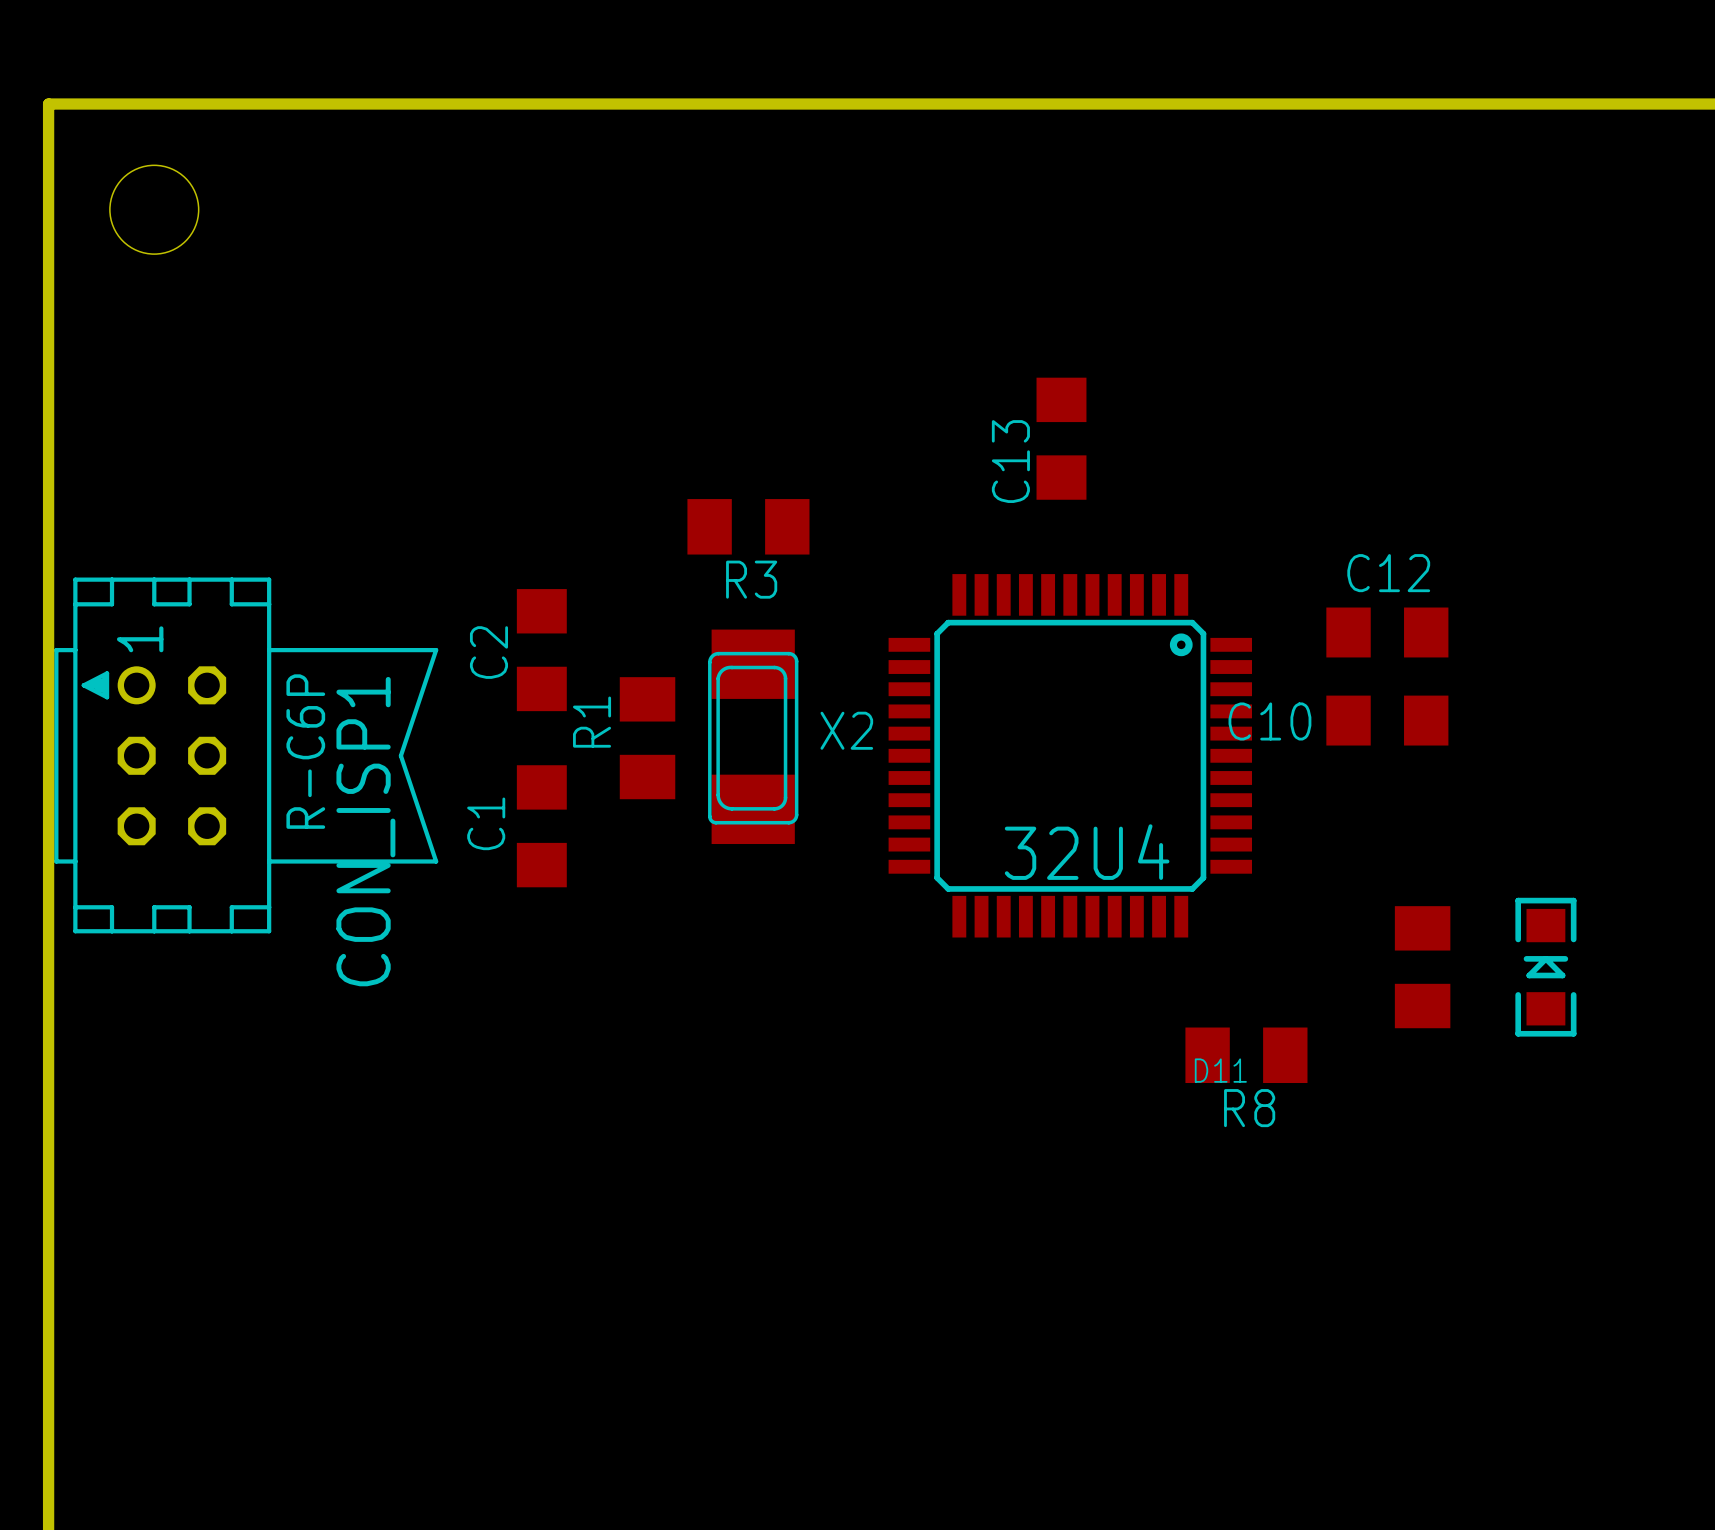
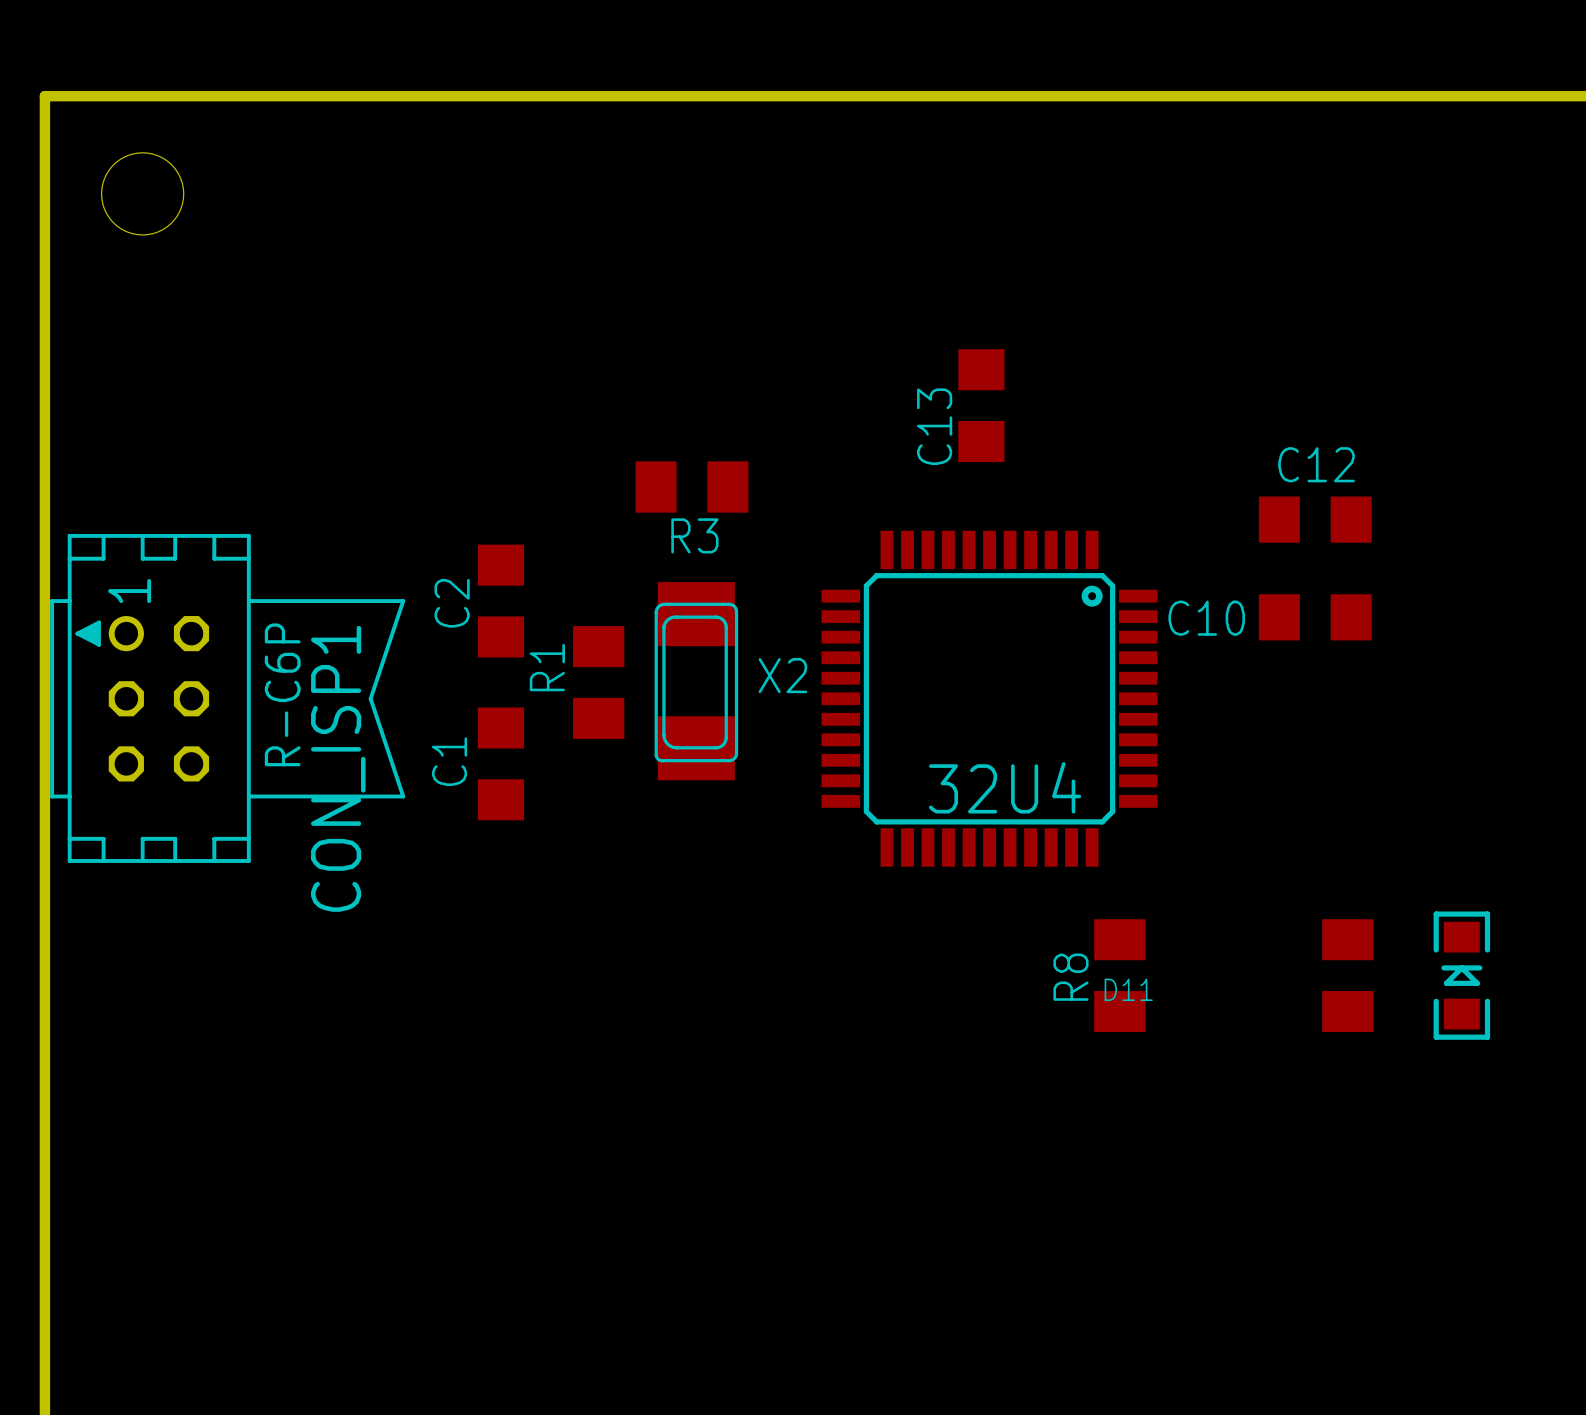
C12 position: (1387, 632) -> (1315, 519)
C10 position: (1387, 720) -> (1315, 617)
part position: (1422, 967) -> (1347, 975)
part position: (1545, 967) -> (1461, 975)
R8 rotation: 0° (1246, 1055) -> 90° clockwise (1119, 975)

